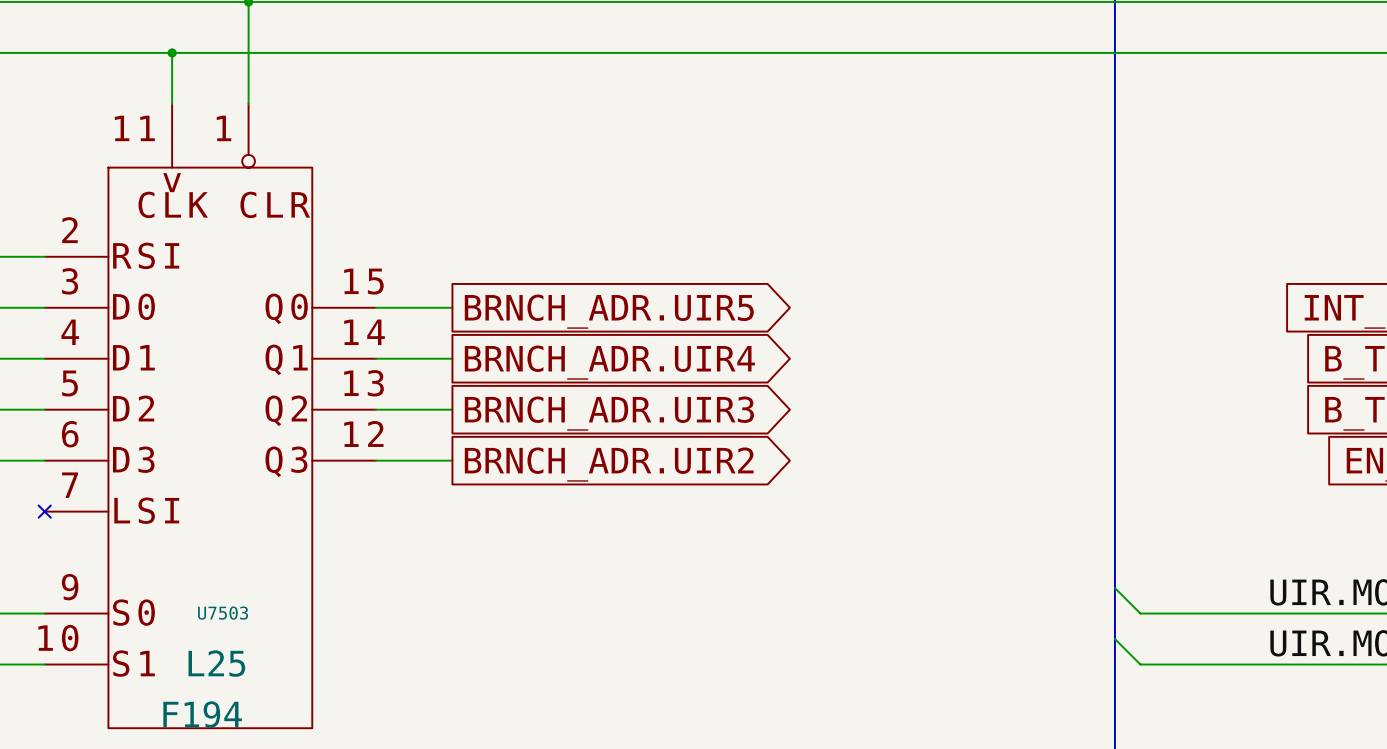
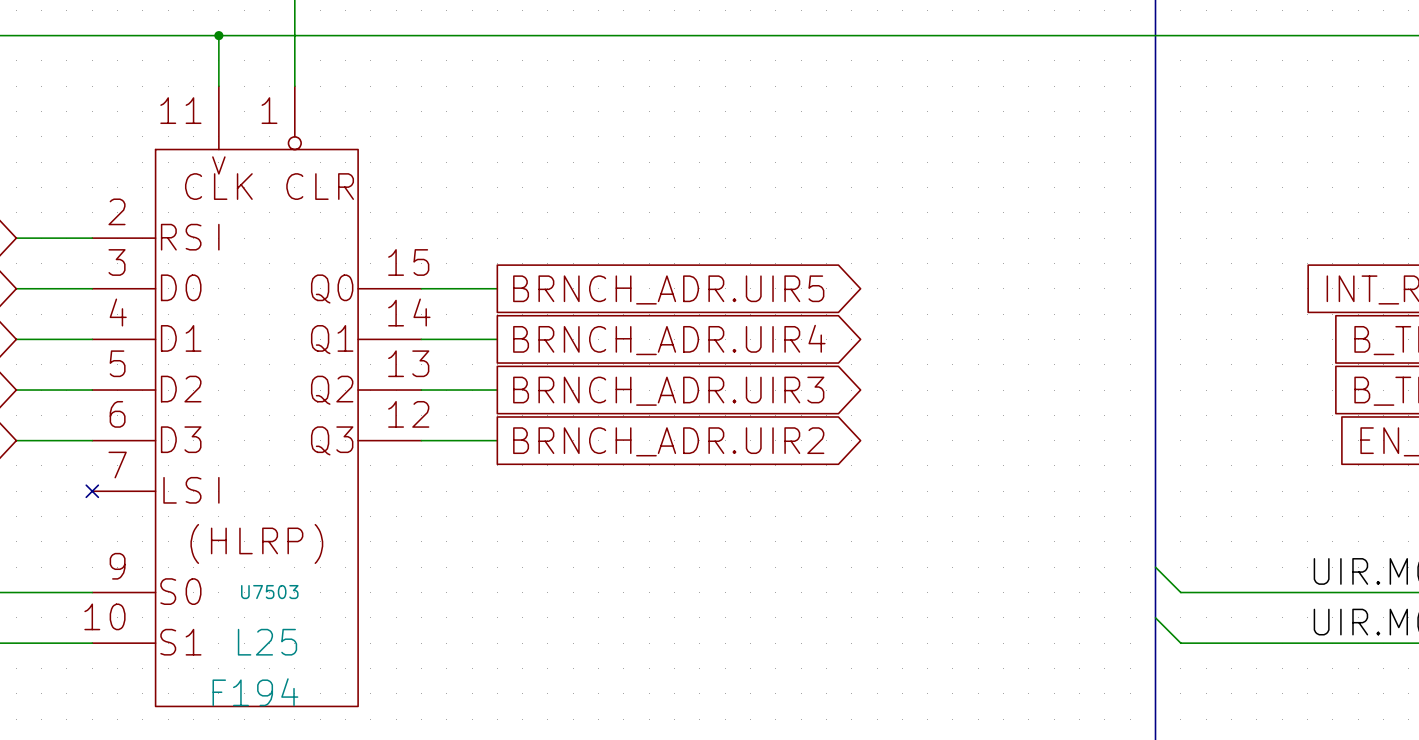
U7503 text: none -> H (218, 540)
U7503 text: none -> L (245, 540)
U7503 text: none -> R (270, 540)
U7503 text: none -> P (295, 540)
U7503 text: none -> ( (194, 543)
U7503 text: none -> ) (318, 543)

